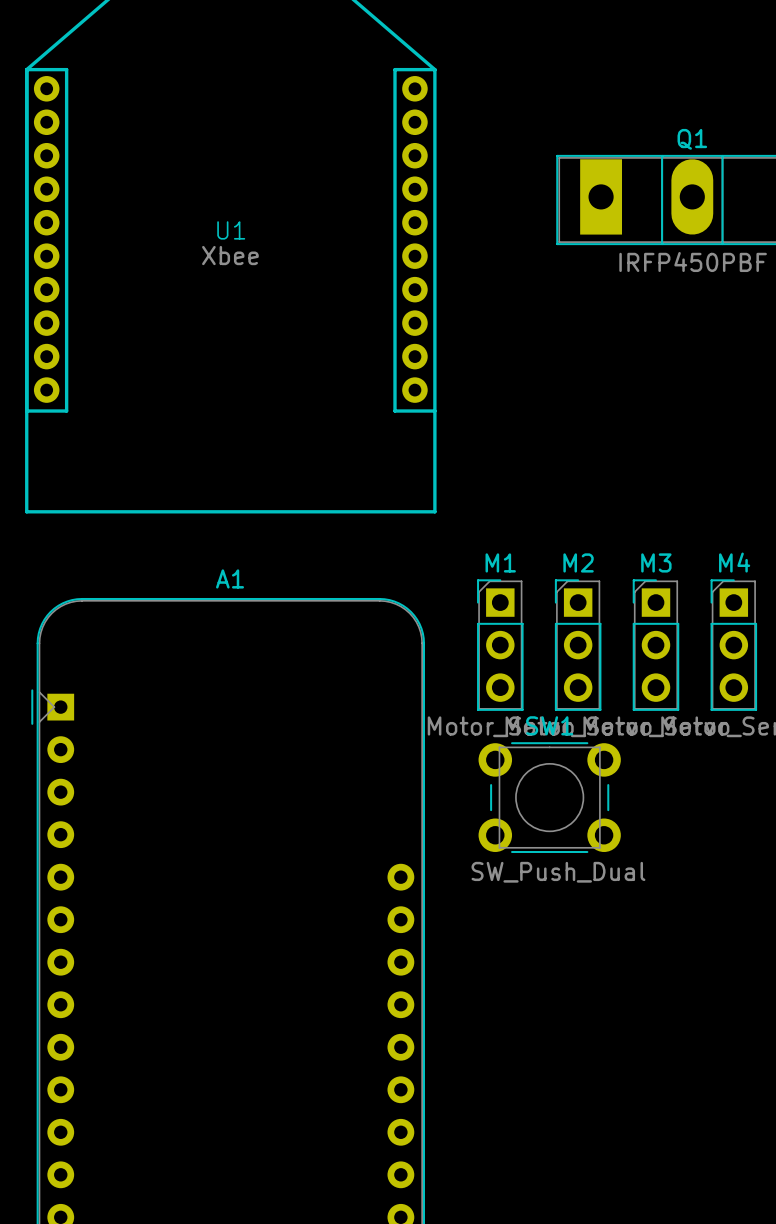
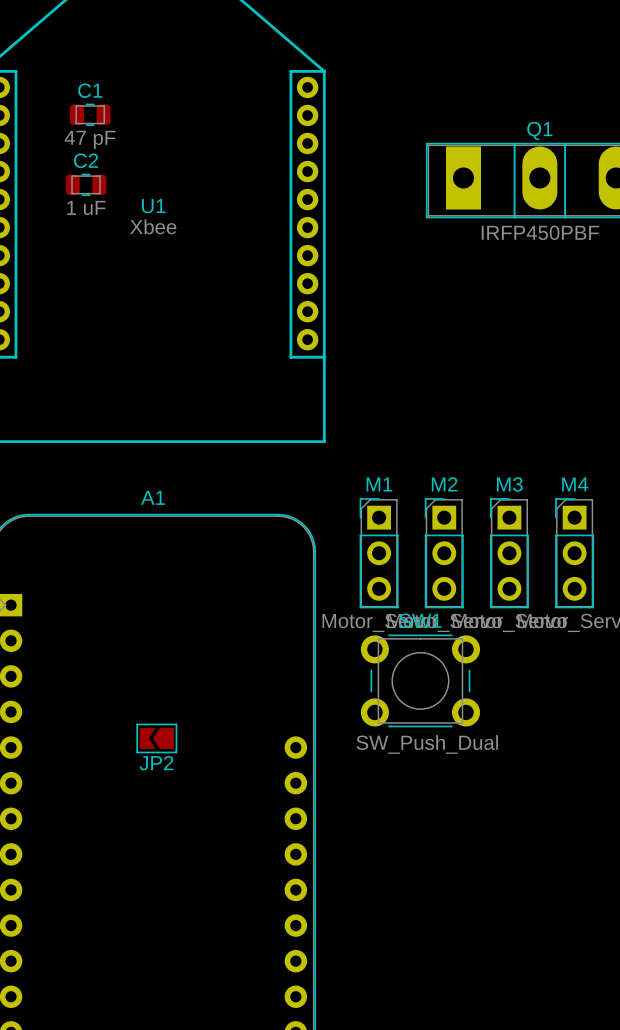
C1: none -> 47 pF (90, 114)
C2: none -> 1 uF (86, 184)
JP2: none -> (156, 738)

